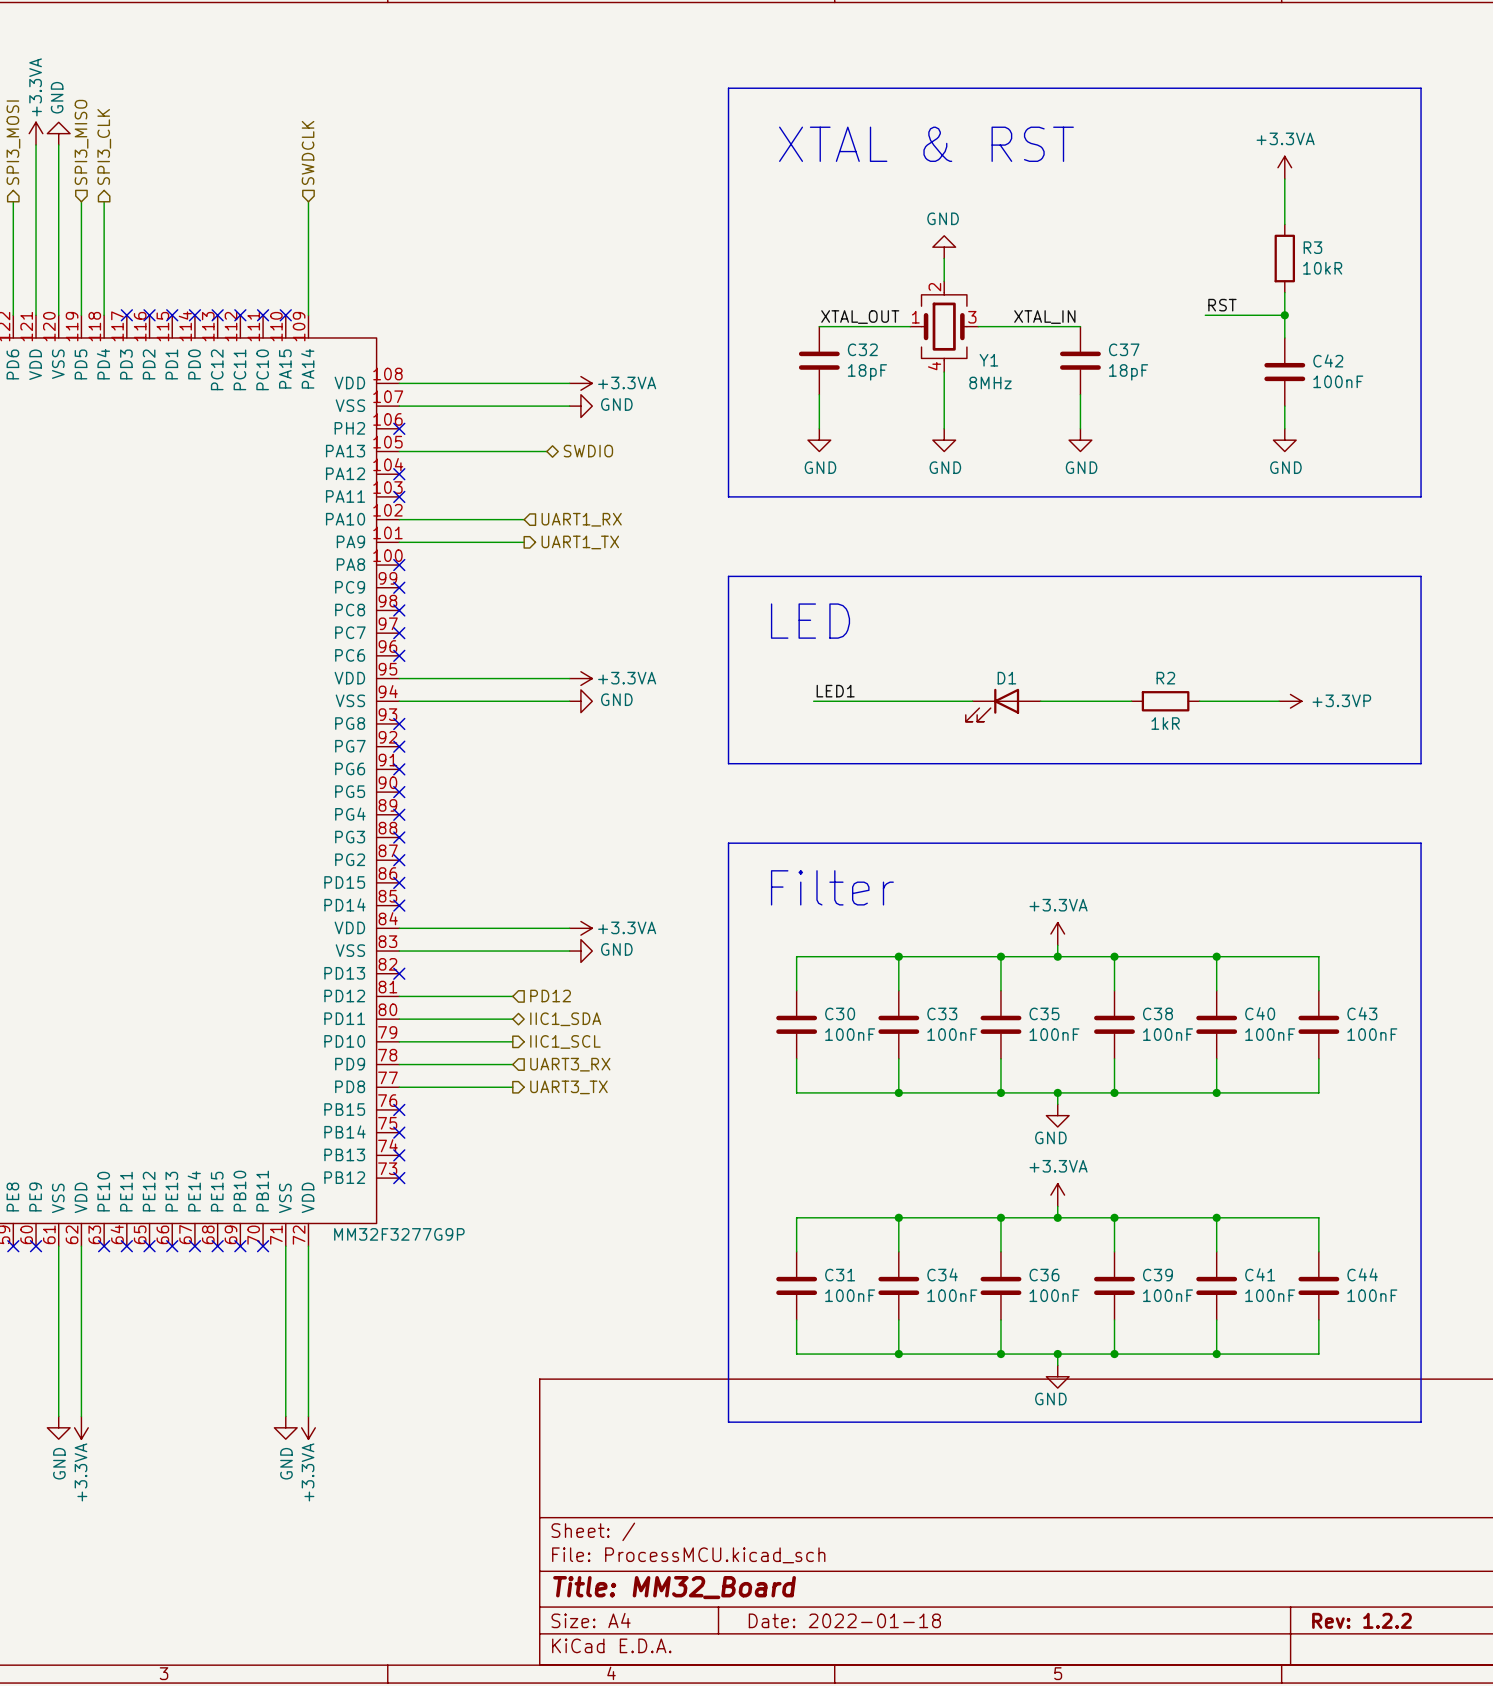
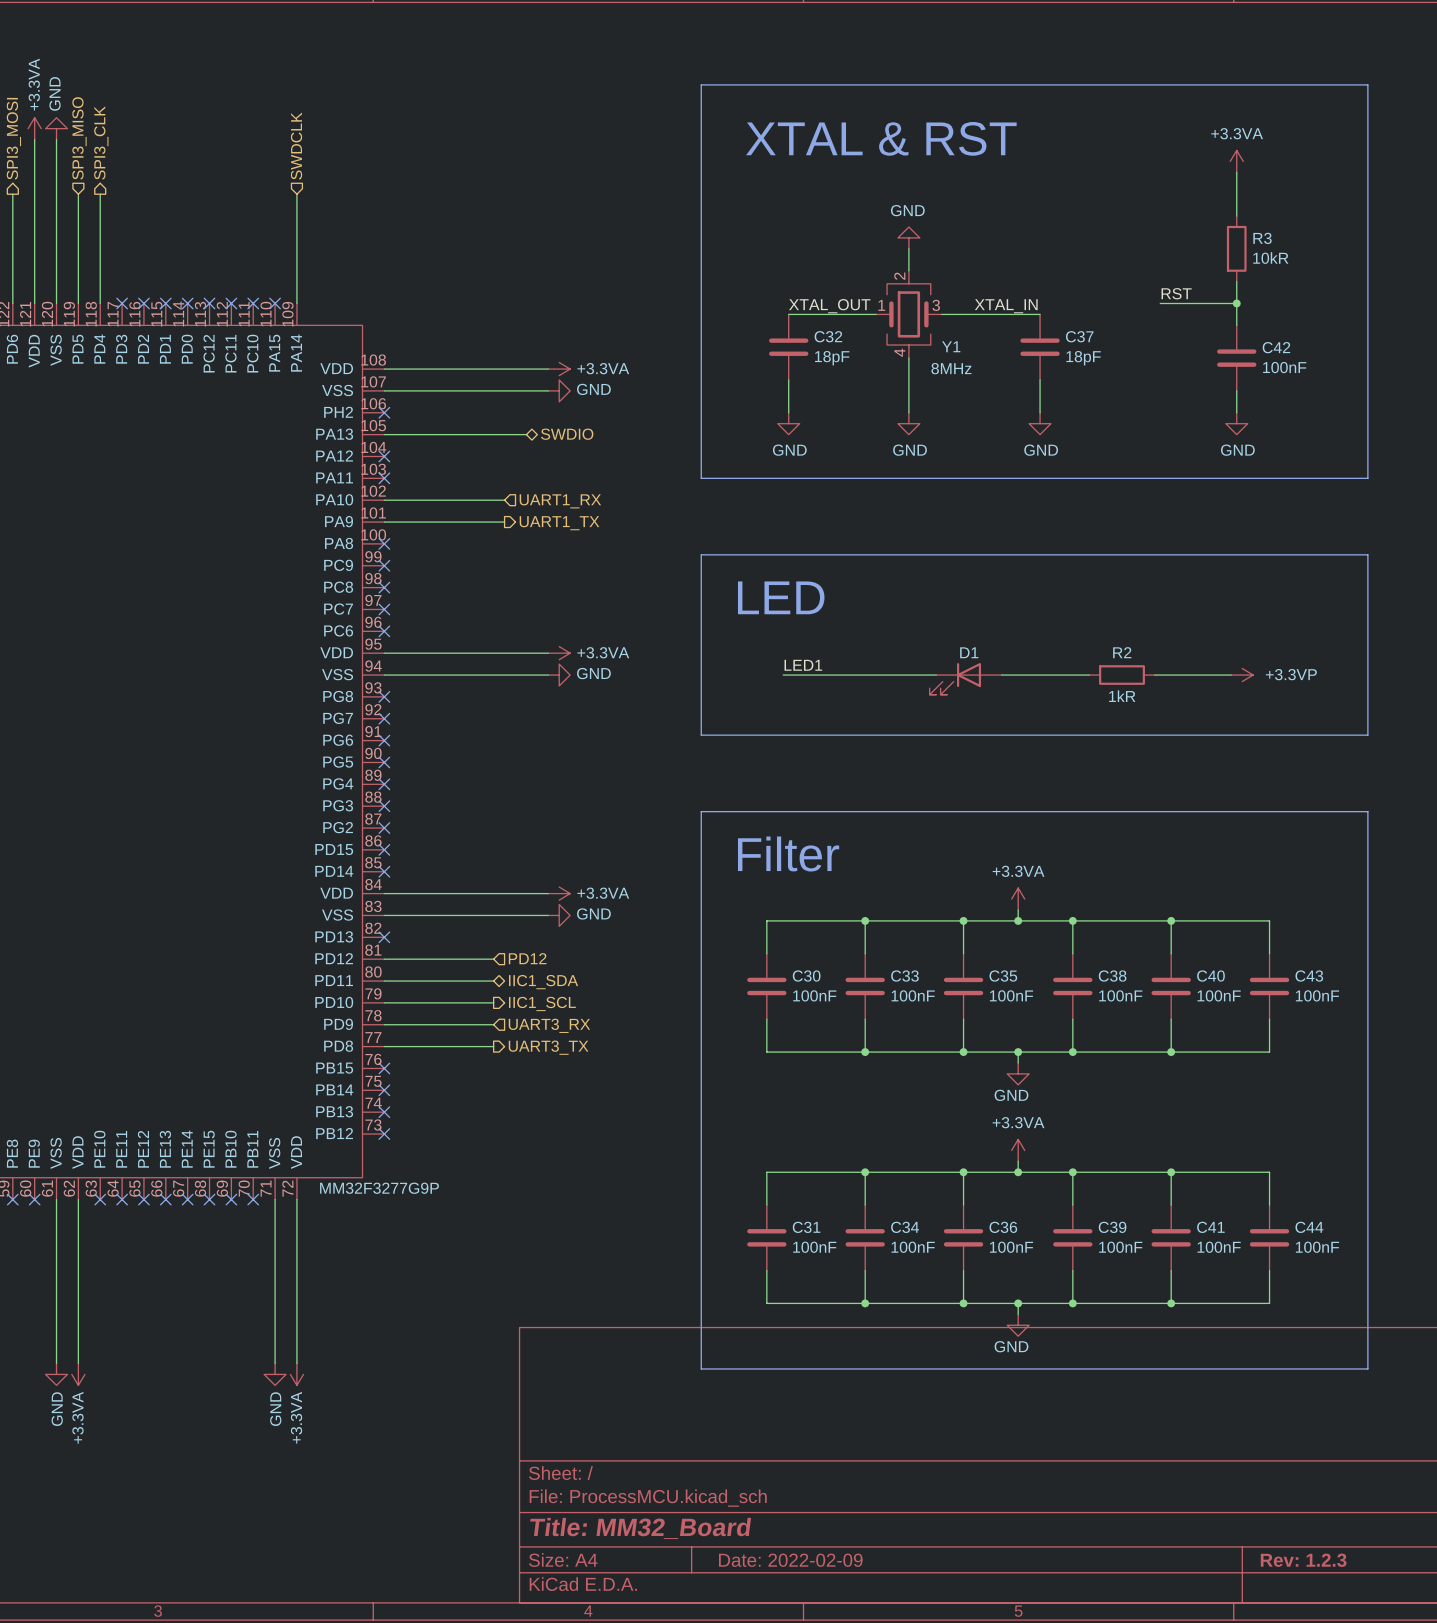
title block: Date: 2022-01-18 (844, 1620) -> Date: 2022-02-09 (790, 1560)
title block: Rev: 1.2.2 (1361, 1620) -> Rev: 1.2.3 (1303, 1560)

